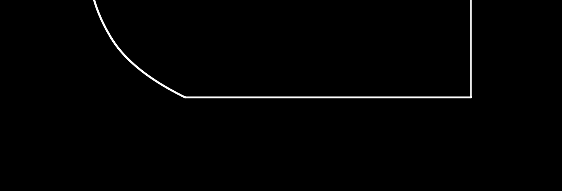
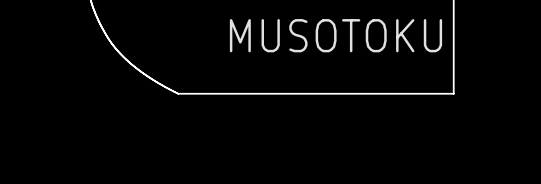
text: none -> MUSOTOKU (335, 35)

